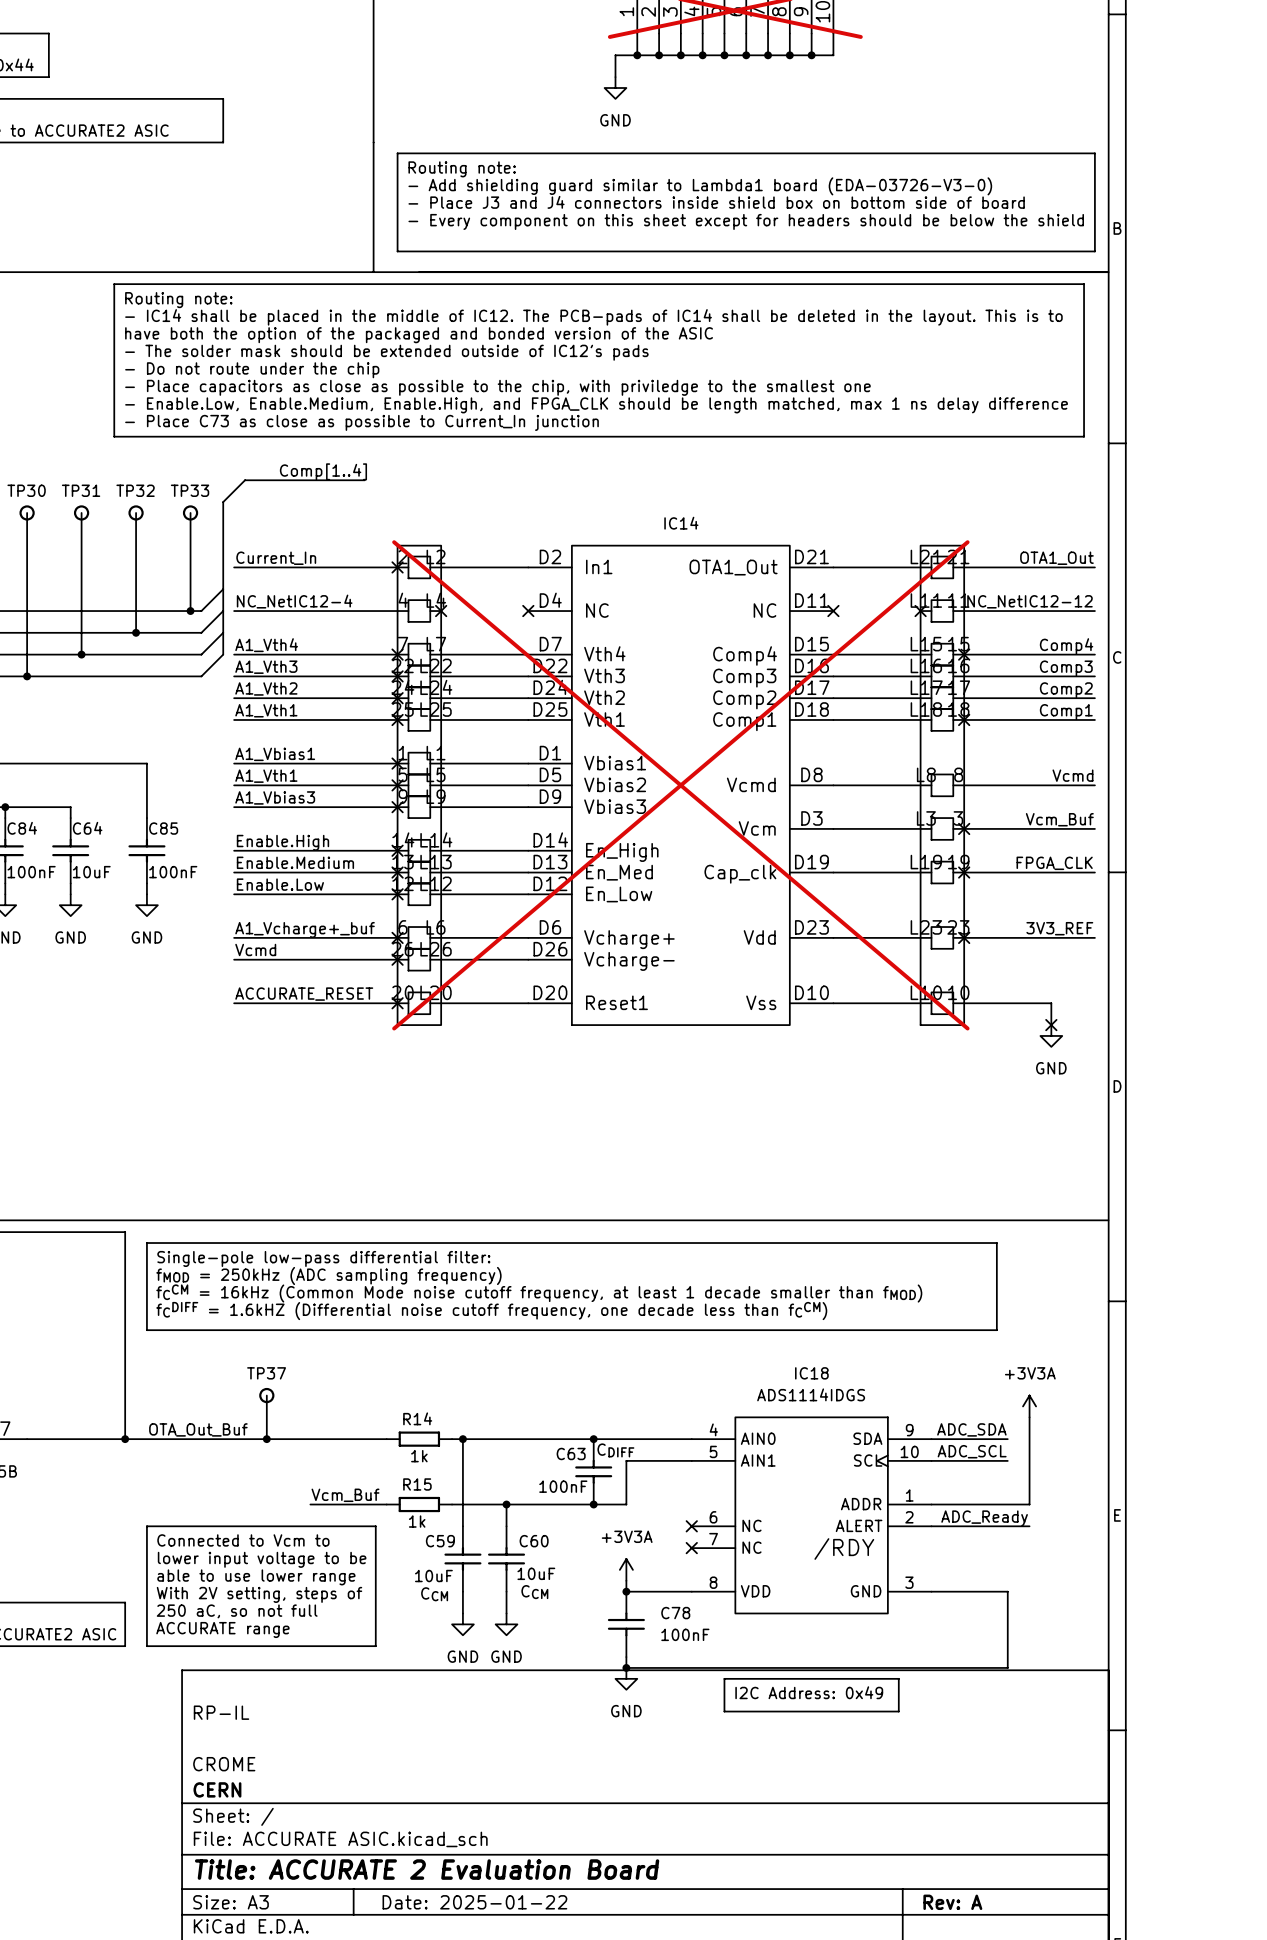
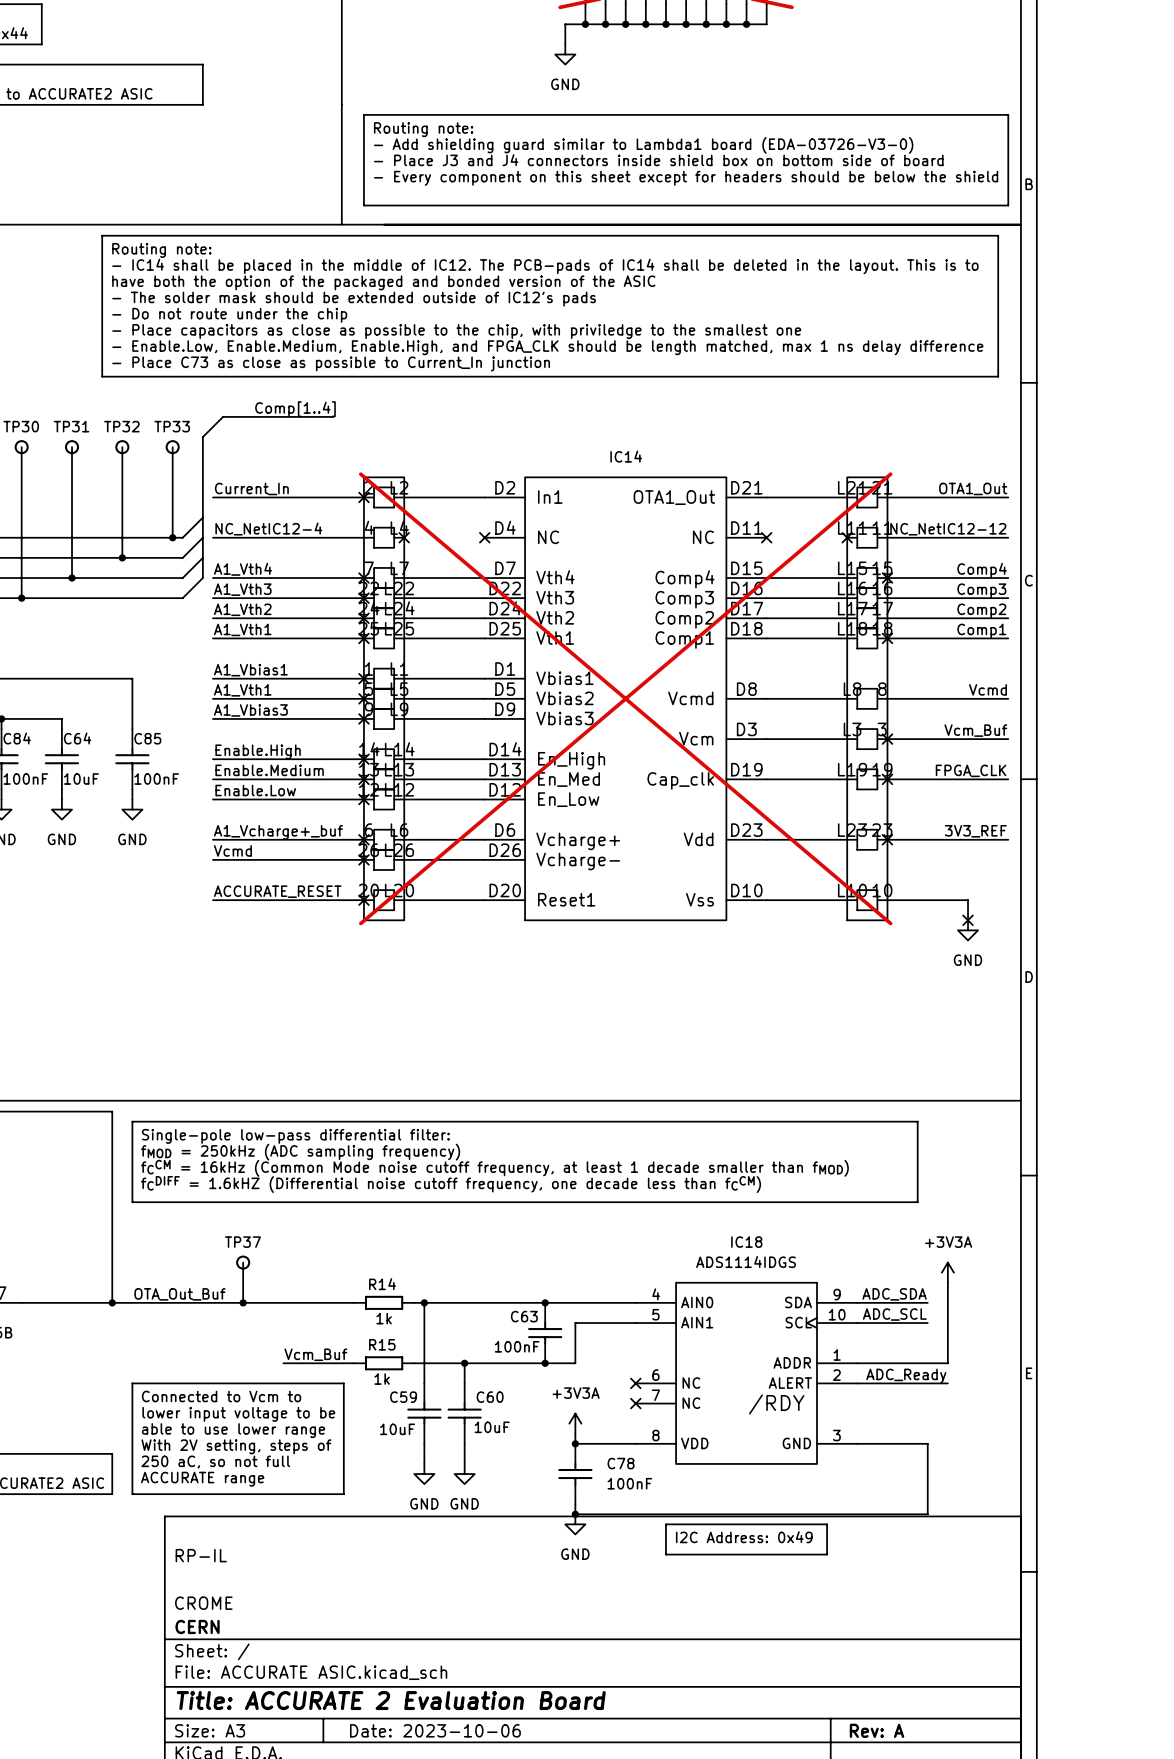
C63 text: CDIFF (615, 1450) -> none
C60 text: CCM (534, 1592) -> none
C59 text: CCM (434, 1594) -> none
title block: Date: 2025-01-22 (474, 1902) -> Date: 2023-10-06 (435, 1730)

